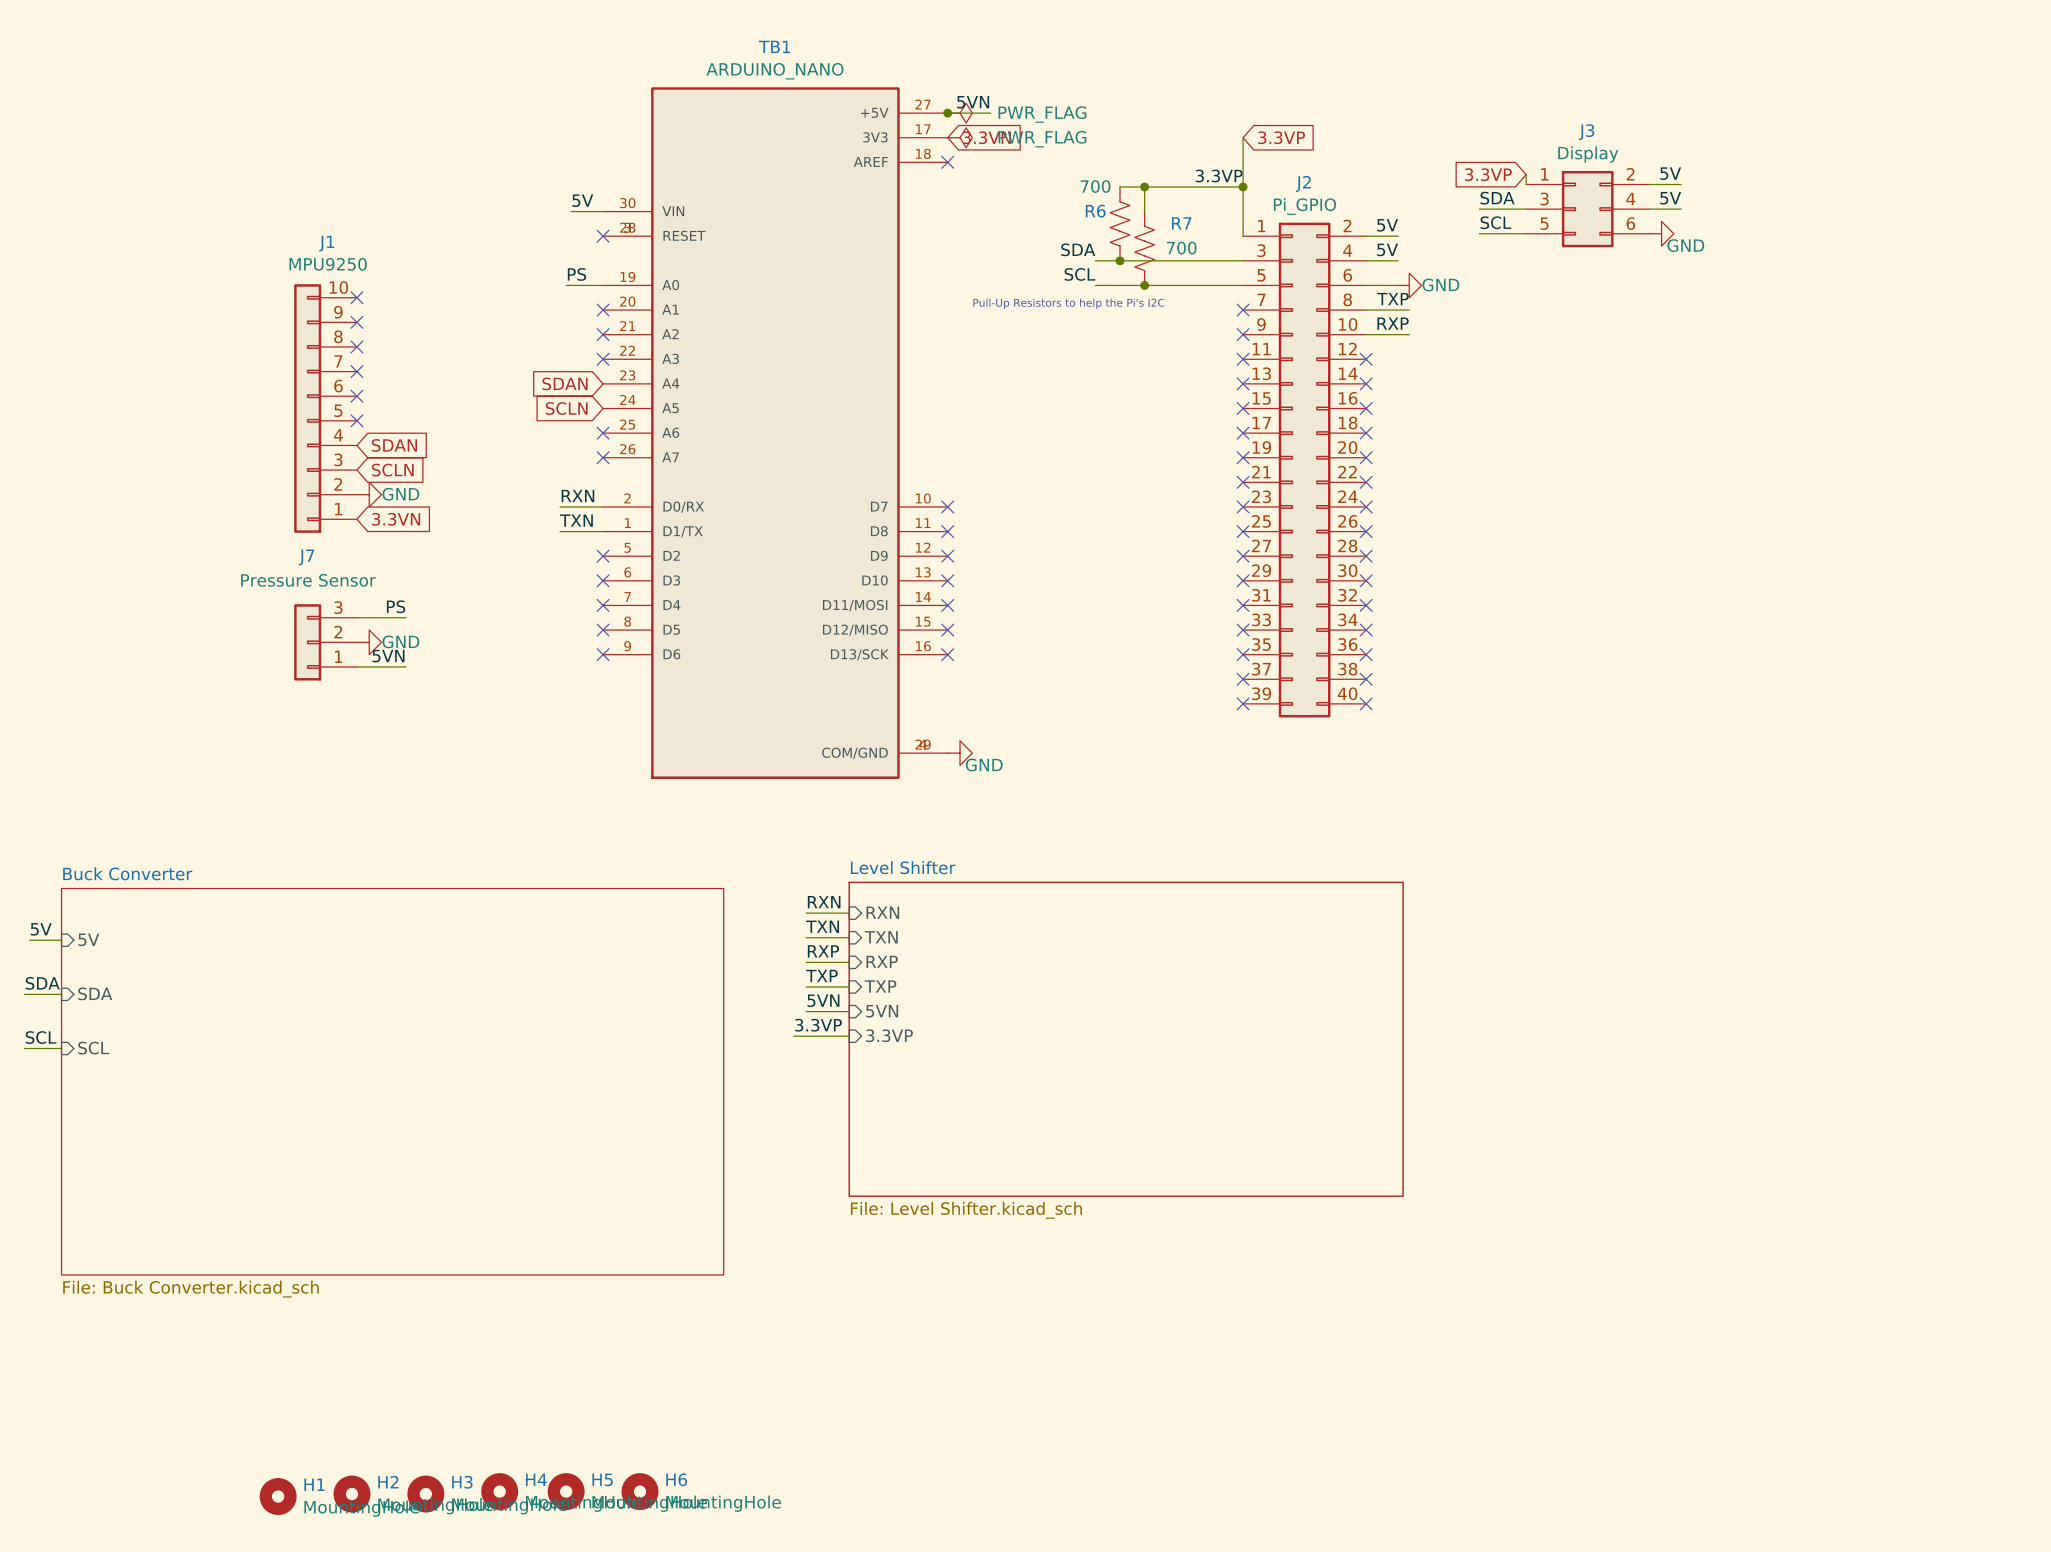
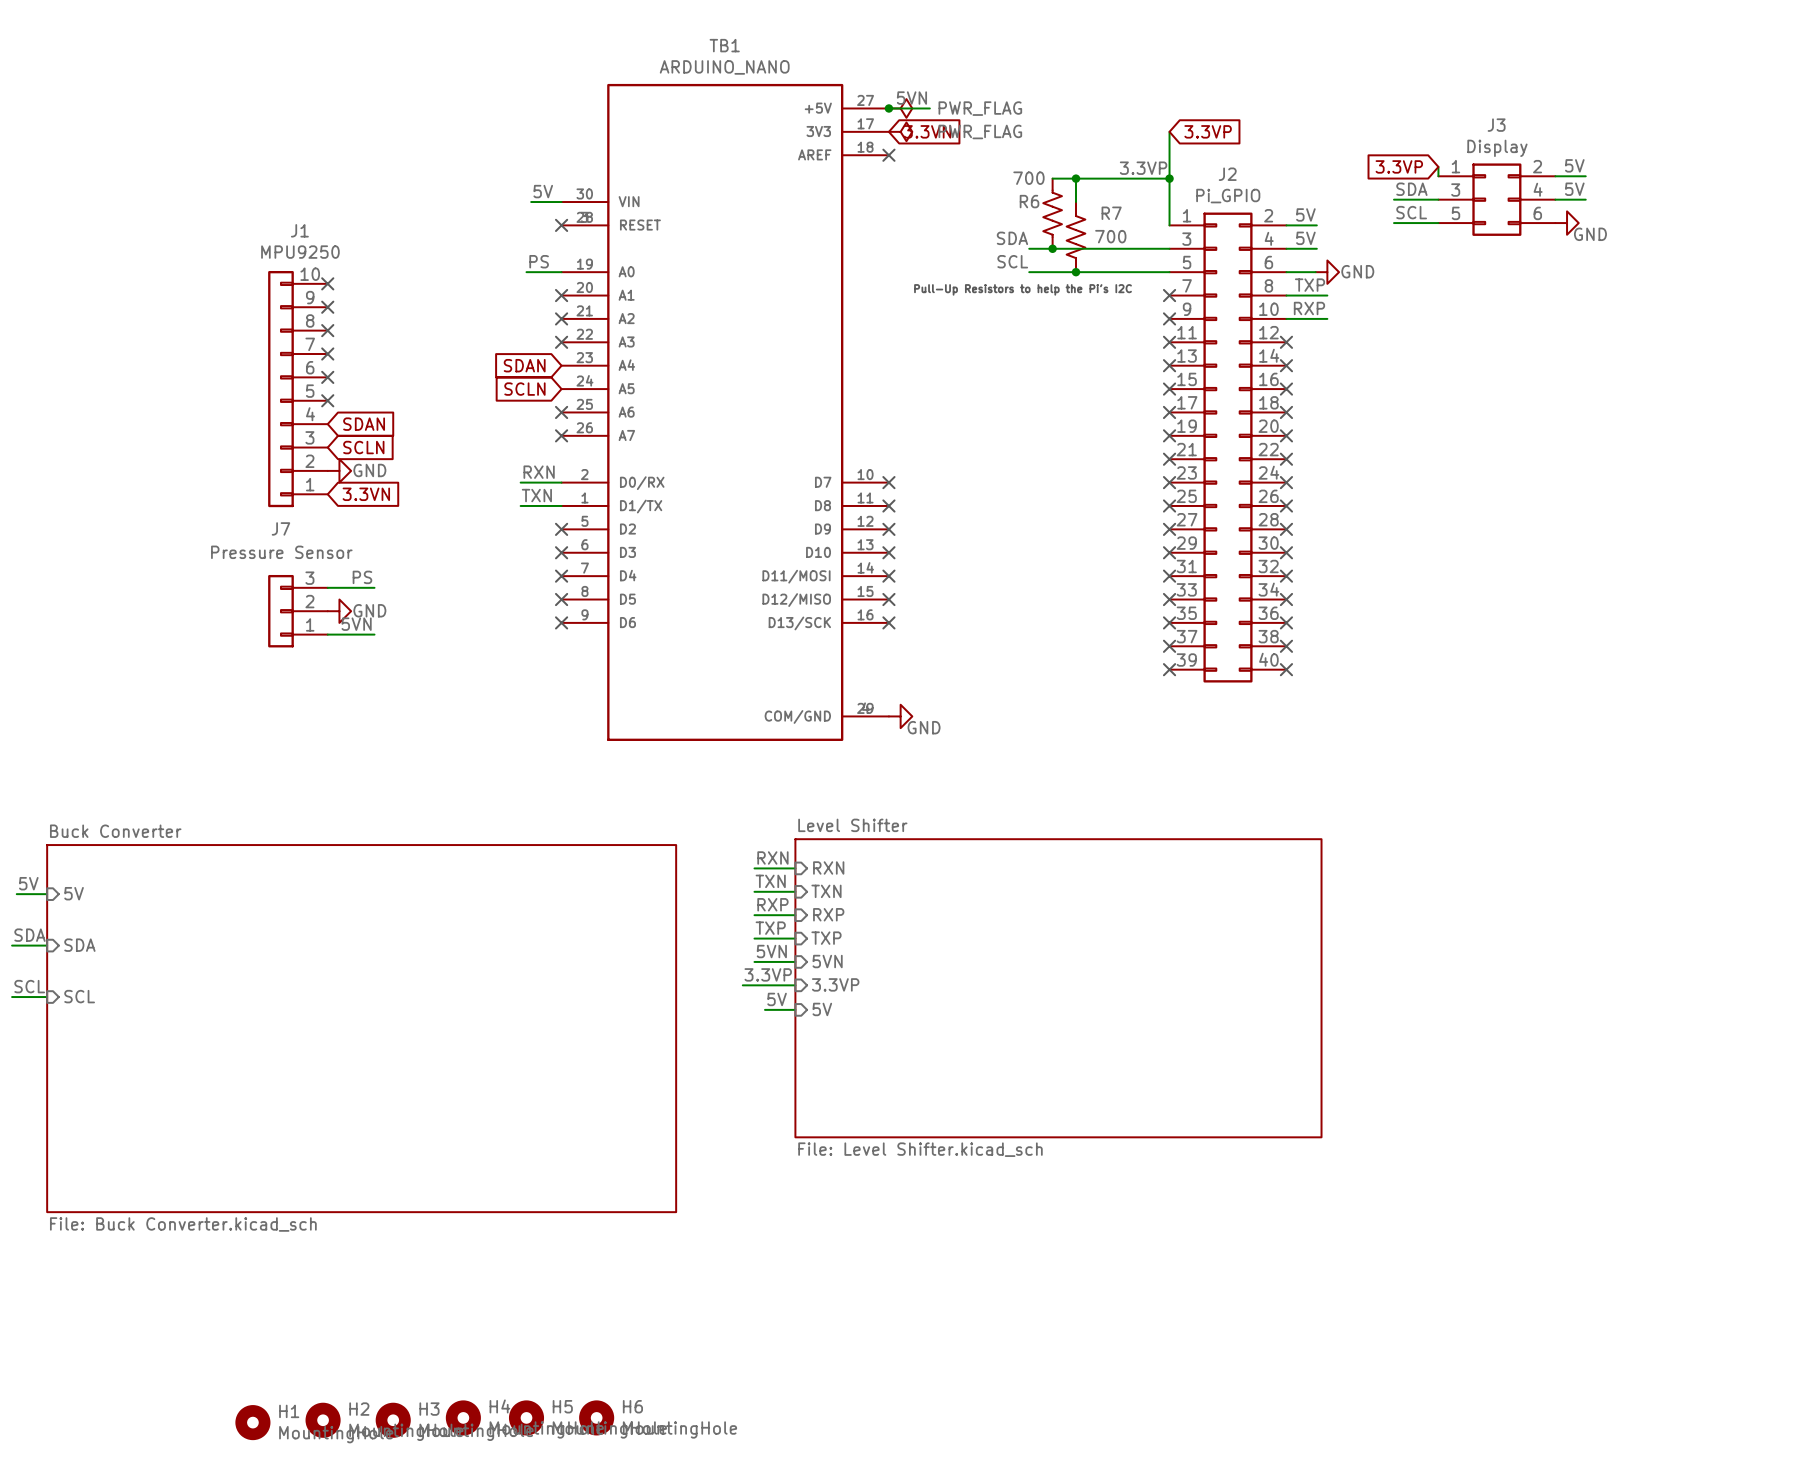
label: none -> 5V (777, 999)
sheet pin: none -> 5V (822, 1009)
wire: none -> (765, 1009) (795, 1009)

